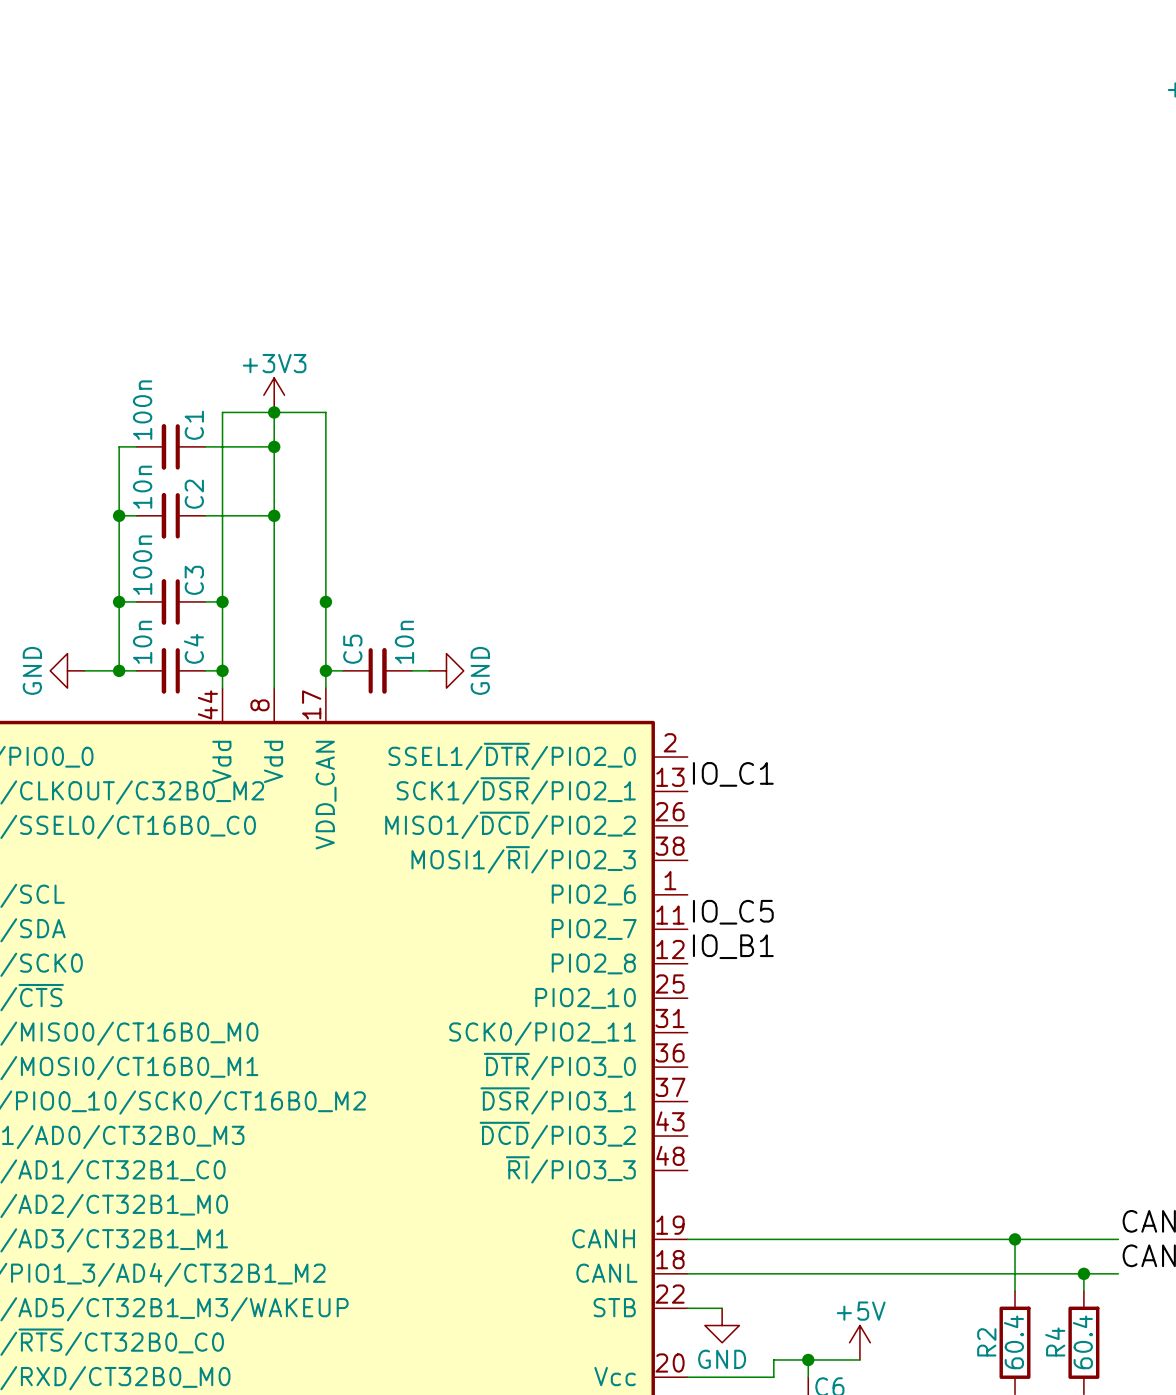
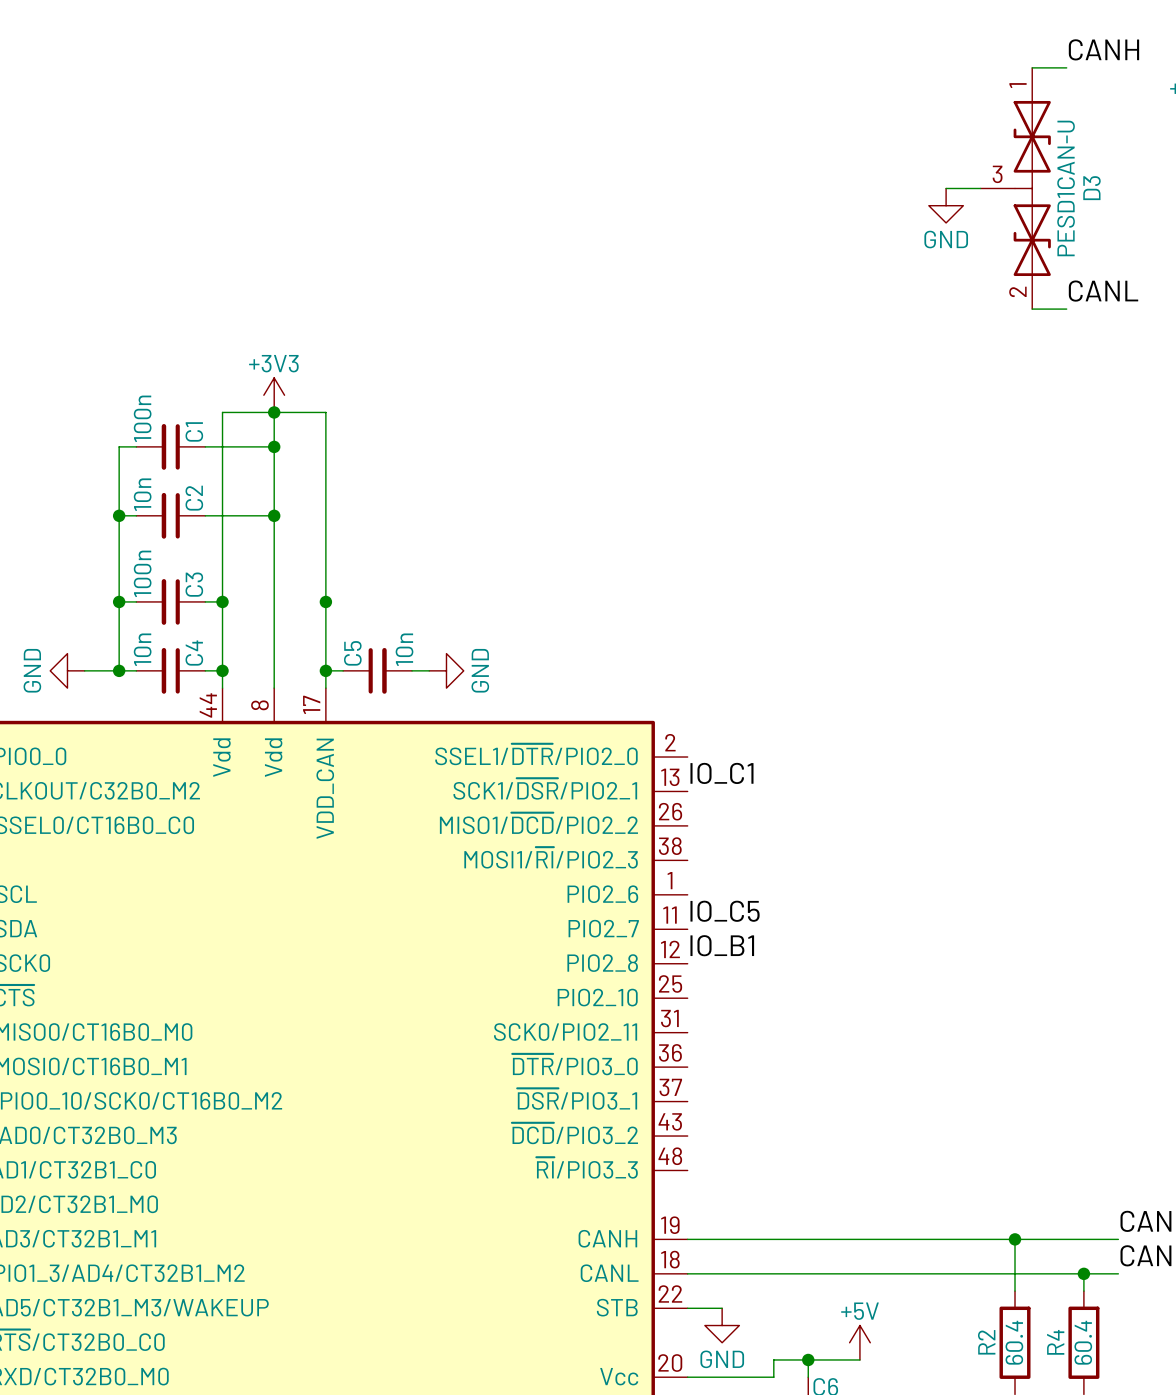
label: none -> CANH (1103, 49)
wire: none -> (1032, 67) (1066, 67)
wire: none -> (946, 188) (980, 188)
D3: none -> PESD1CAN-U (1015, 188)
power symbol: none -> GND (946, 205)
label: none -> CANL (1103, 291)
wire: none -> (1032, 309) (1066, 309)

